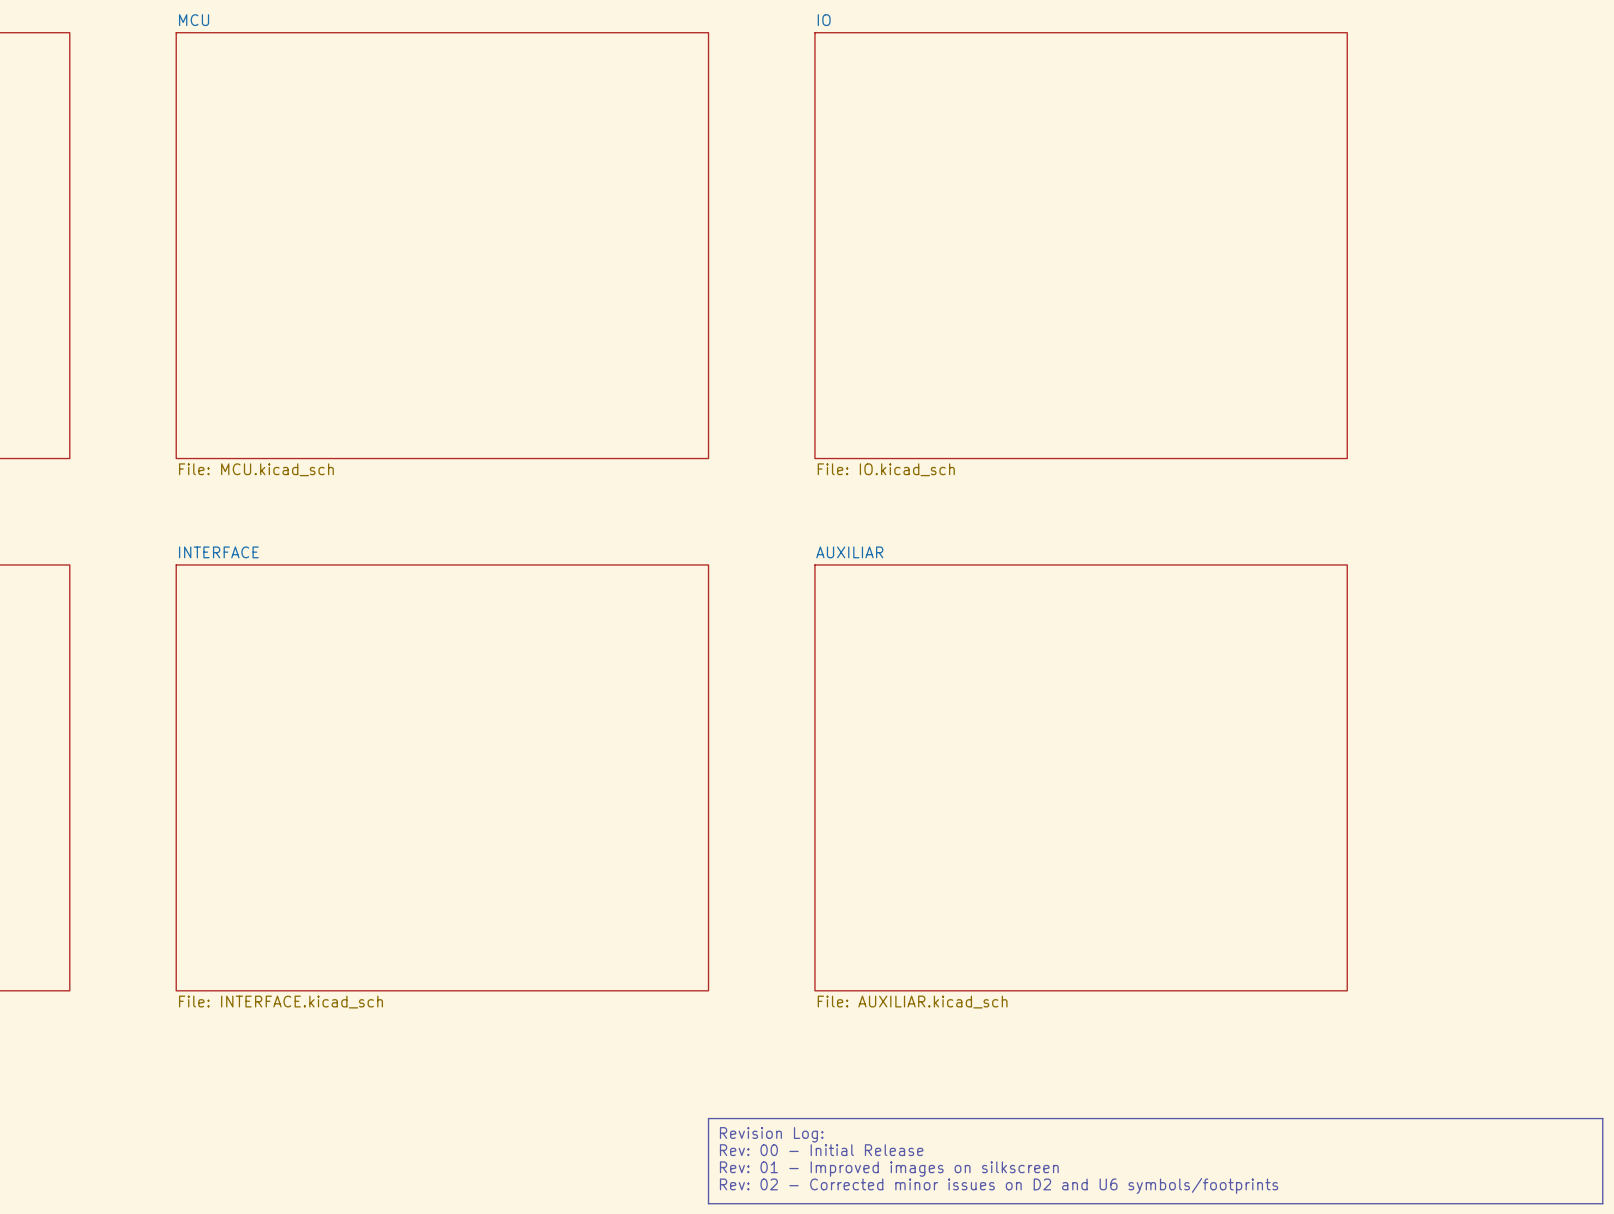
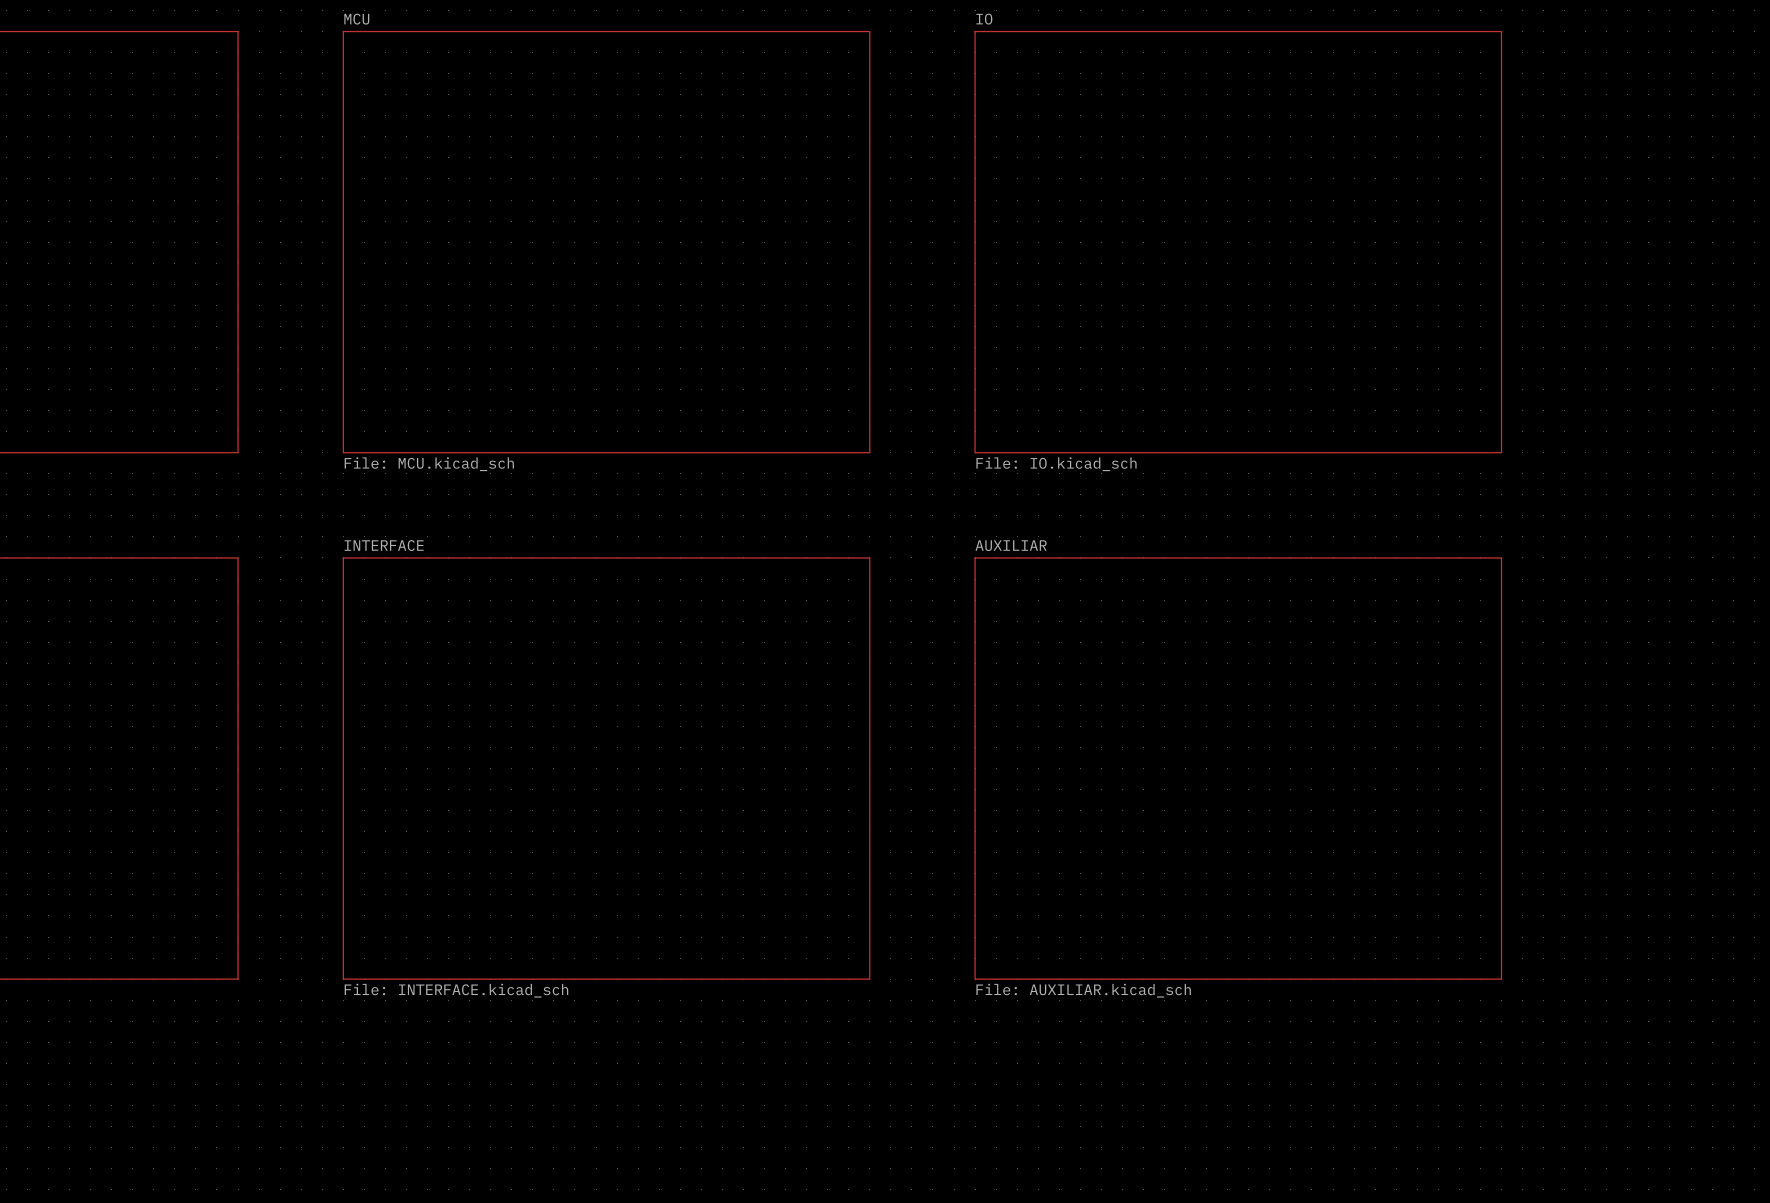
line: (708, 1118) (1602, 1118) (1602, 1203) (708, 1203) (708, 1118) -> none
text: Revision Log: (771, 1134) -> none
text: Rev: 00 - Initial Release (821, 1150) -> none
text: Rev: 01 - Improved images on silkscreen (889, 1169) -> none
text: Rev: 02 - Corrected minor issues on D2 and U6 symbols/footprints (999, 1185) -> none

